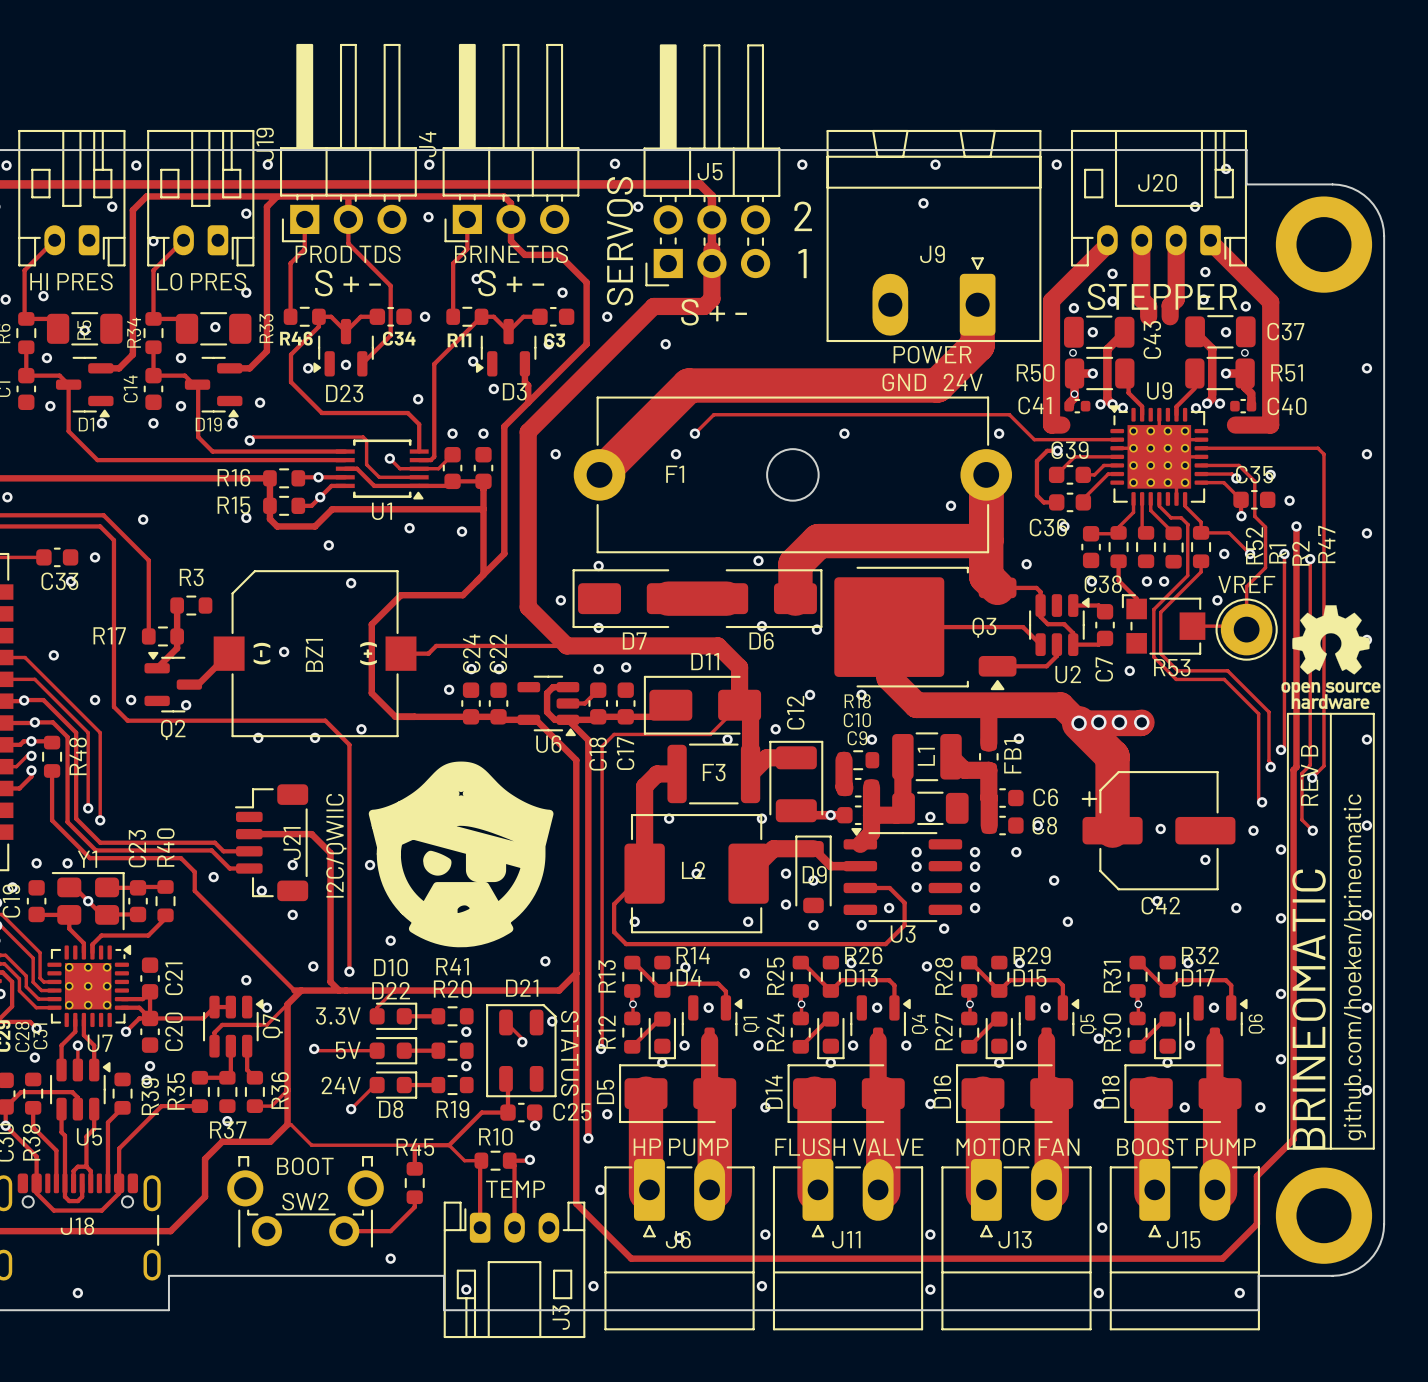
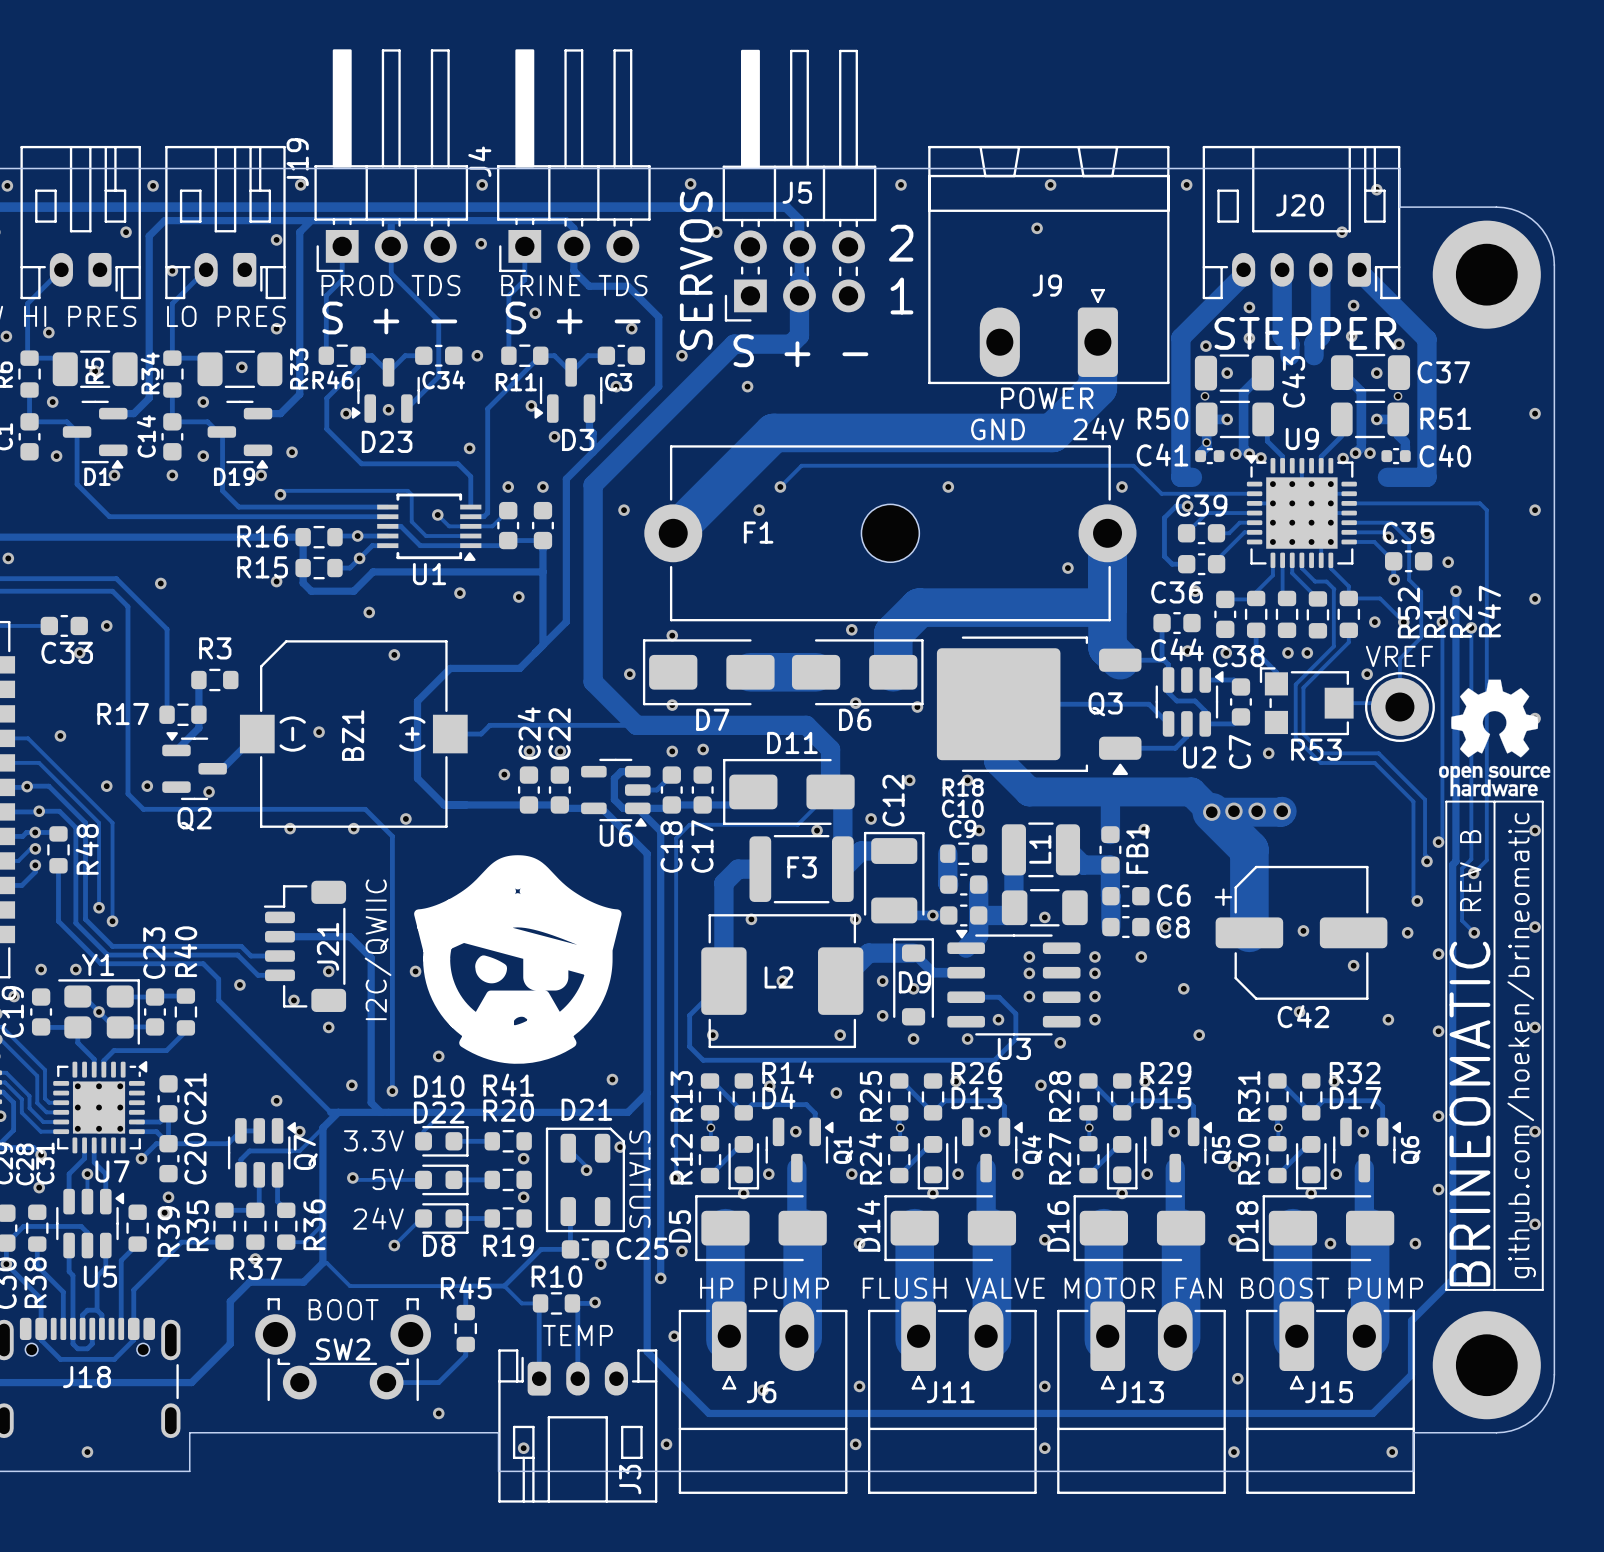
track: none -> (1162, 623) (1162, 658) (1163, 660)
C44: none -> (1177, 623)
via position: (1026, 564) -> (1187, 651)

